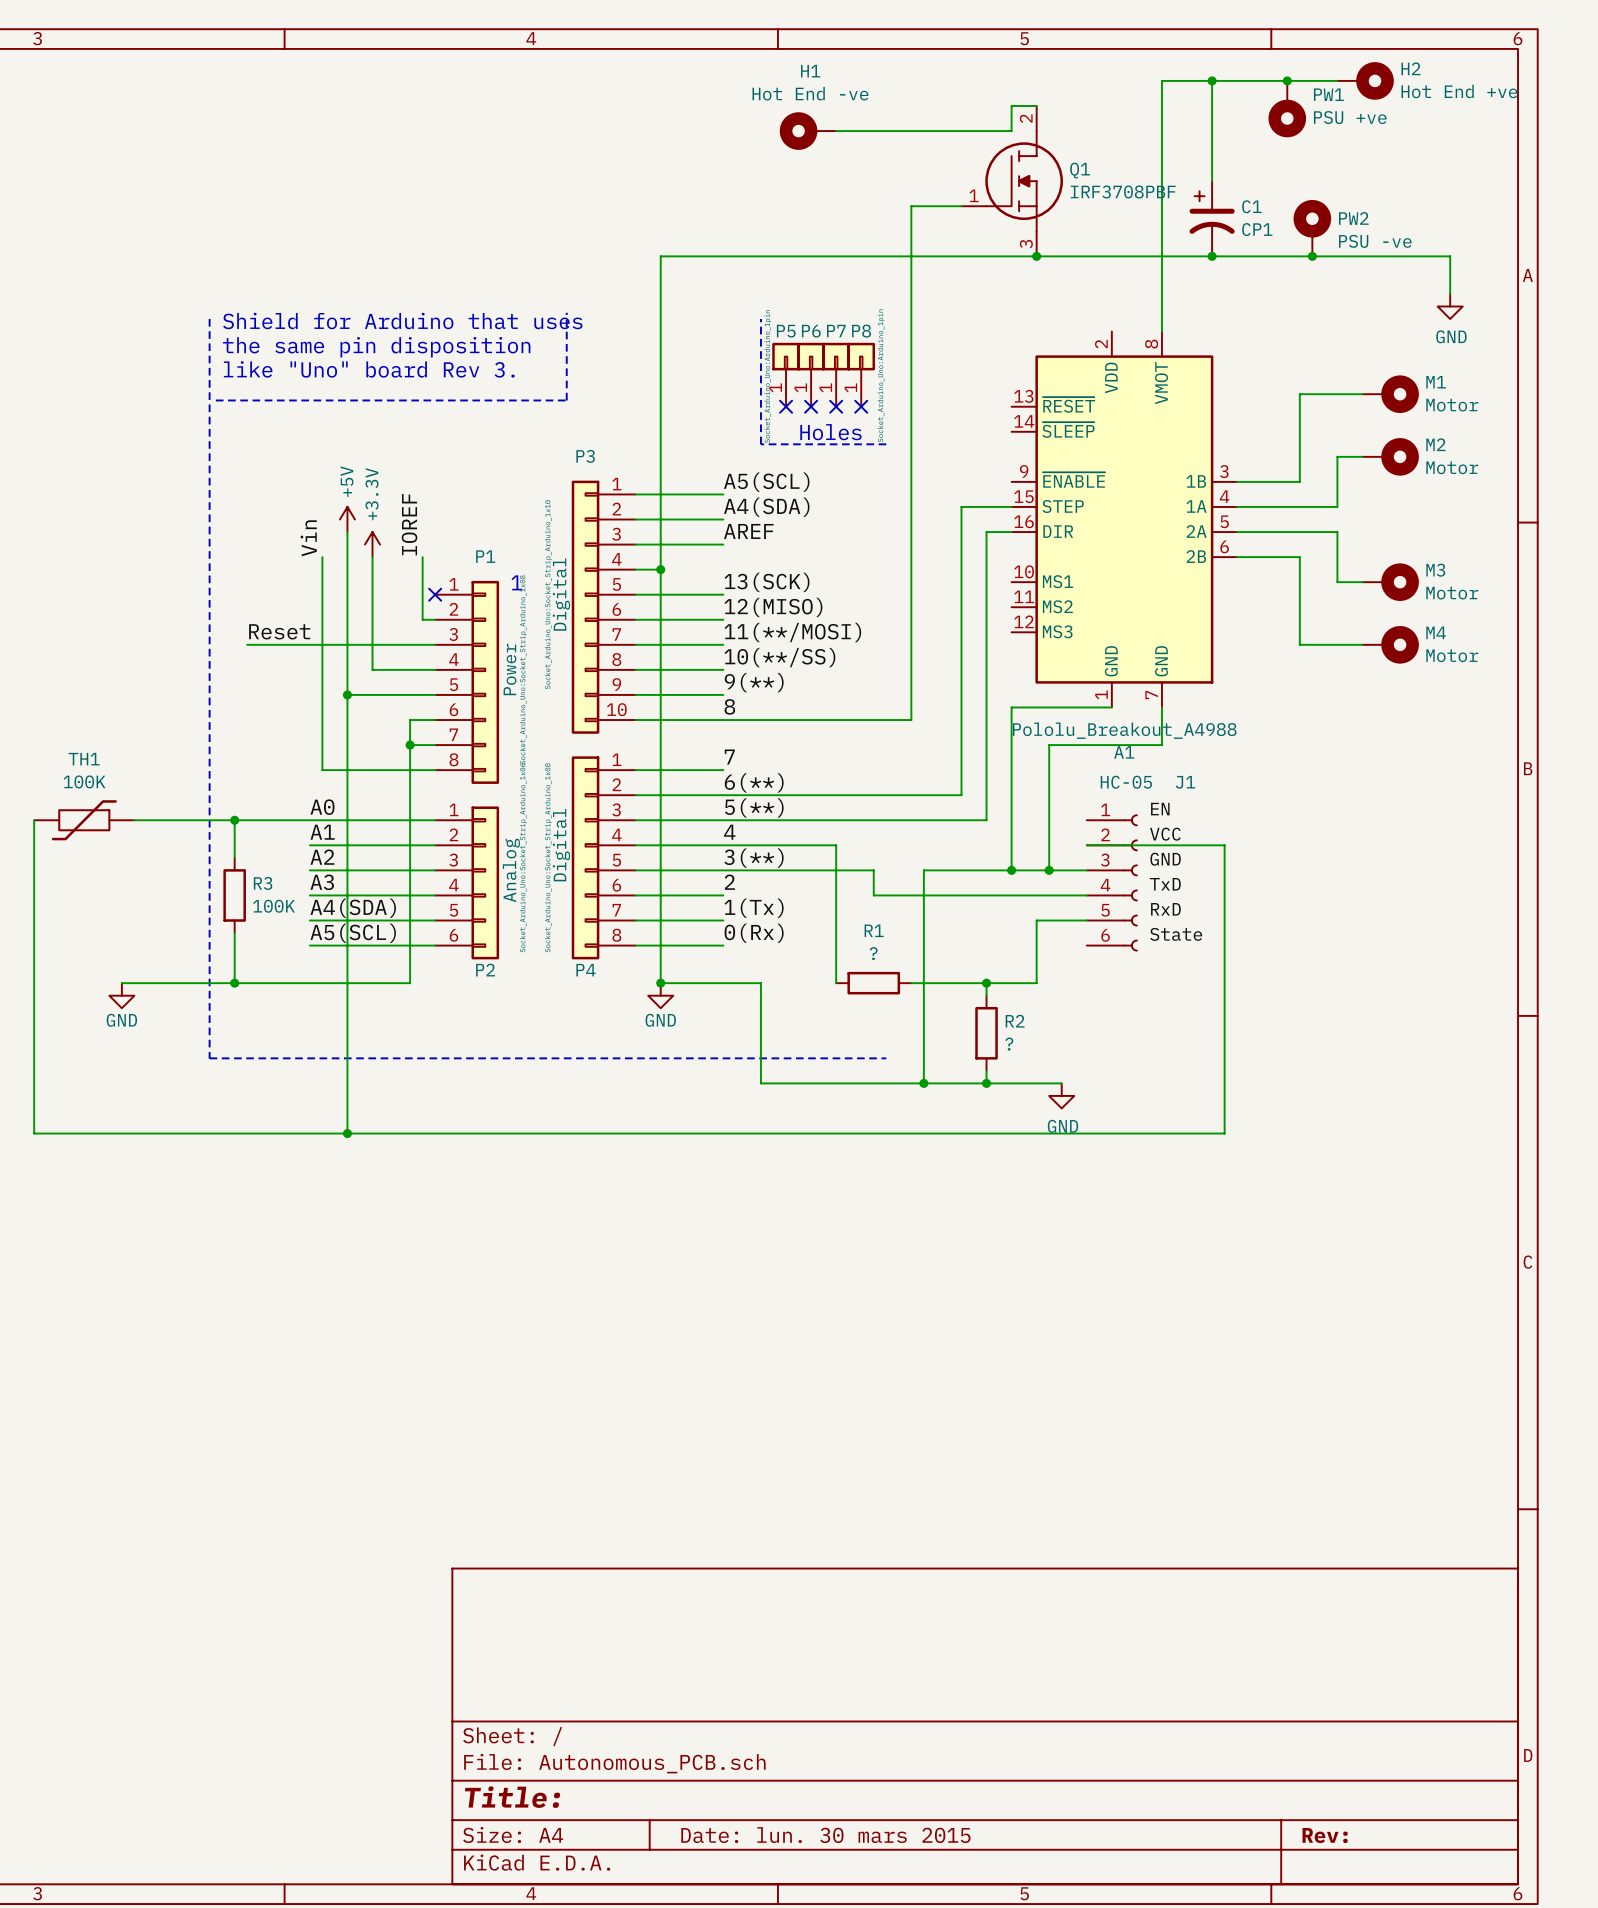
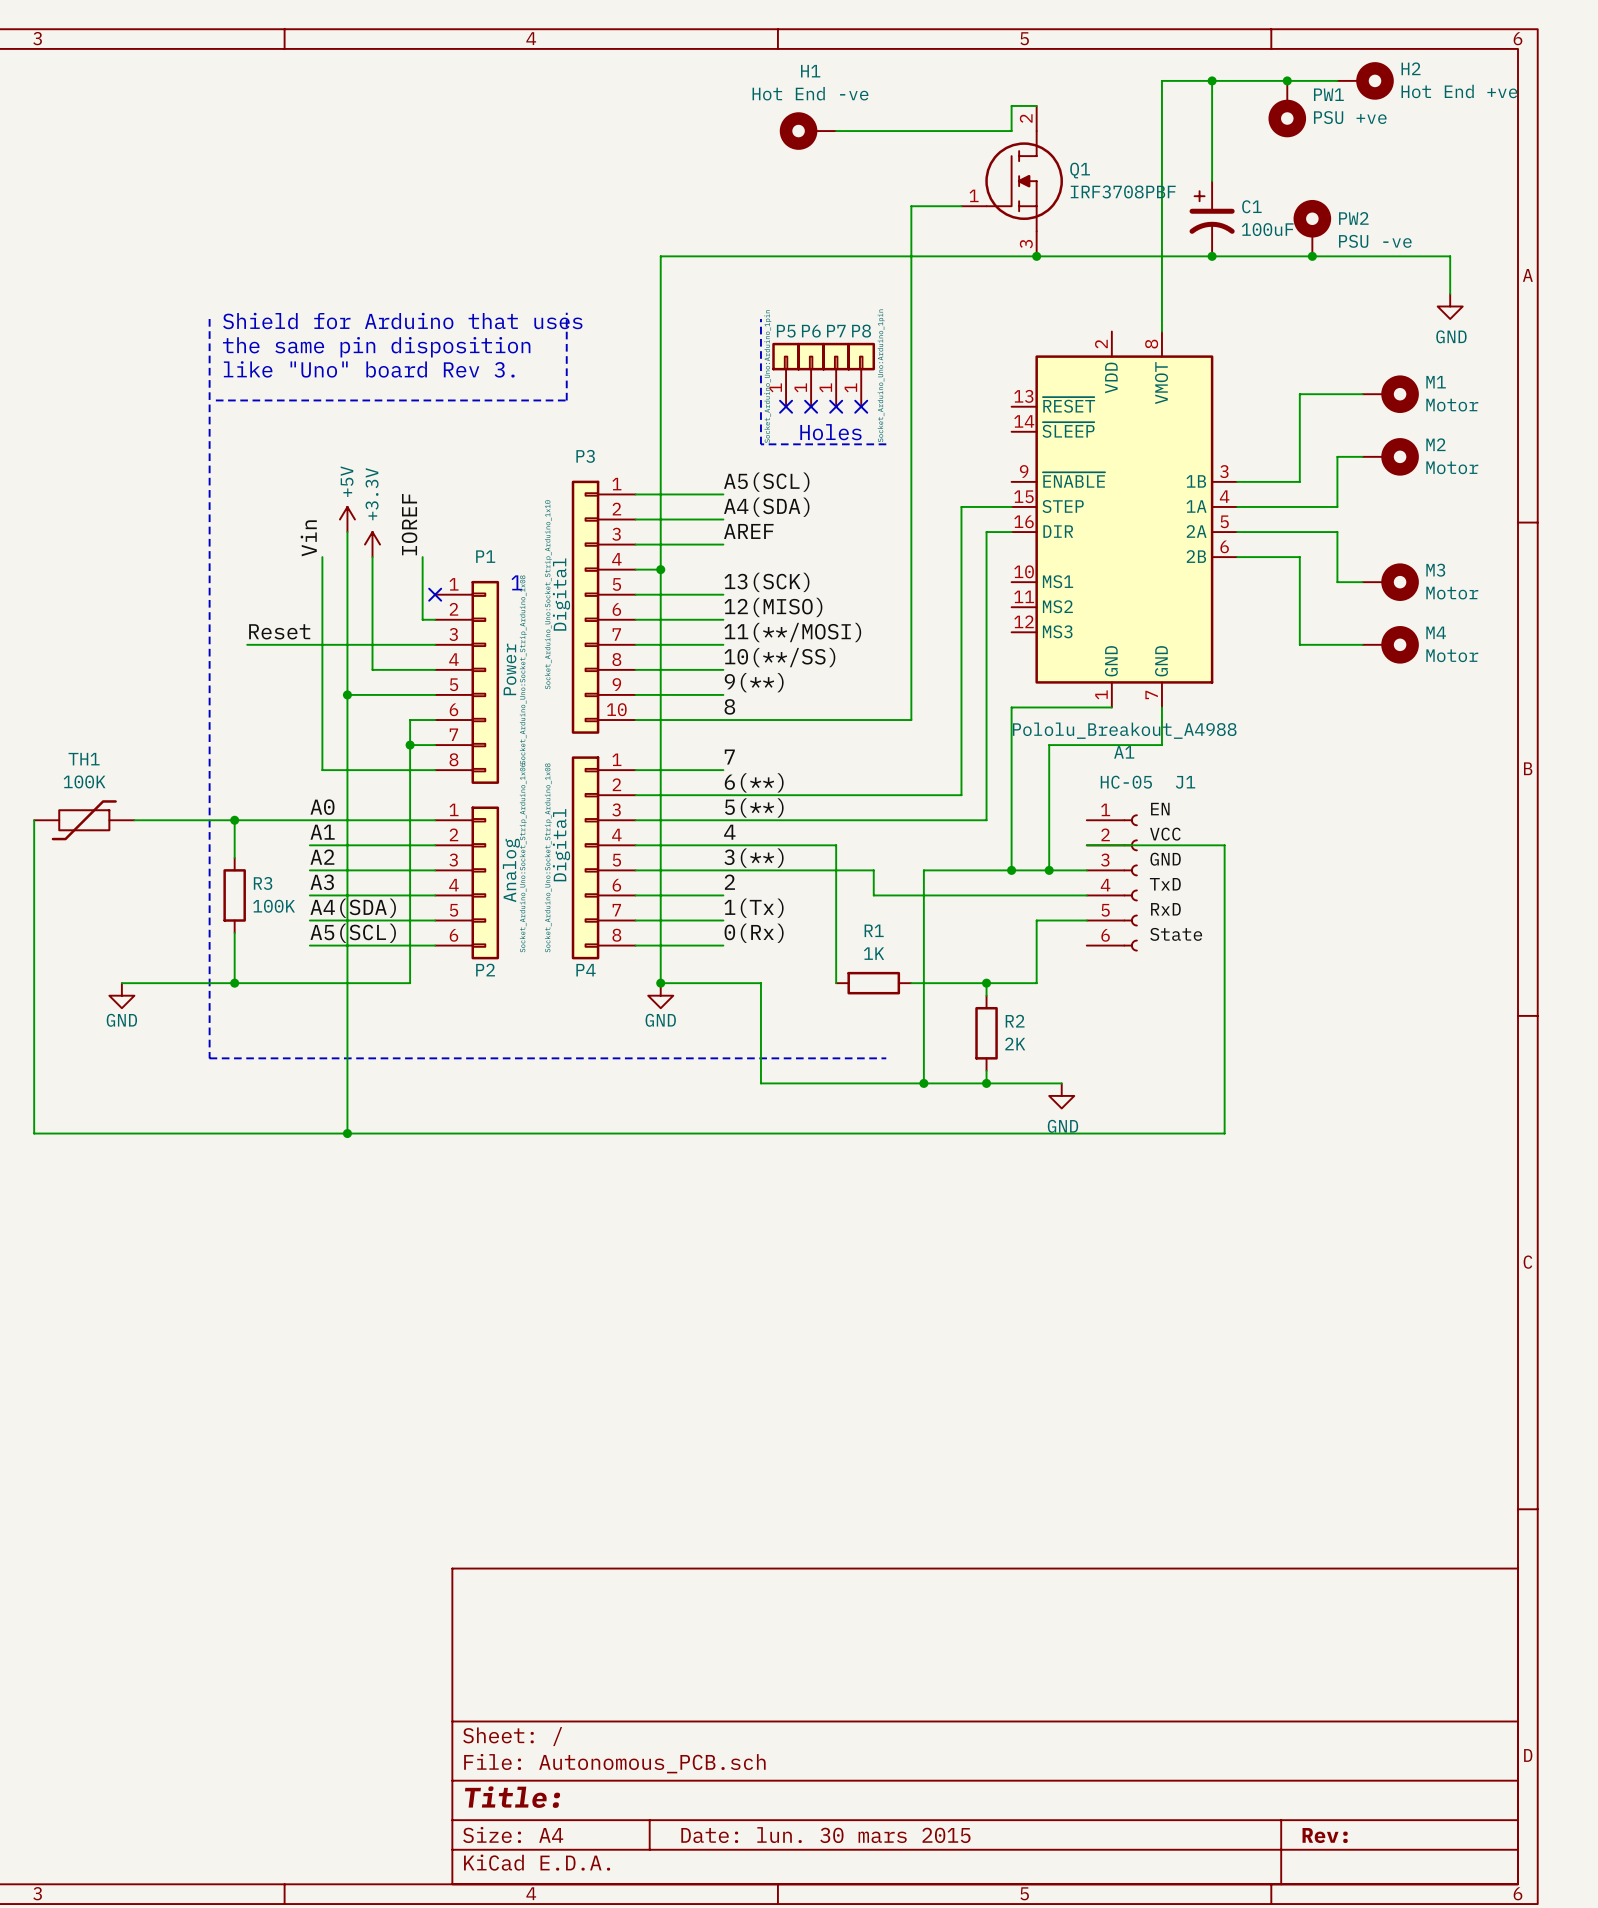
C1 value: CP1 (1257, 229) -> 100uF (1267, 229)
R1 value: ? (873, 953) -> 1K (874, 953)
R2 value: ? (1009, 1044) -> 2K (1015, 1043)

